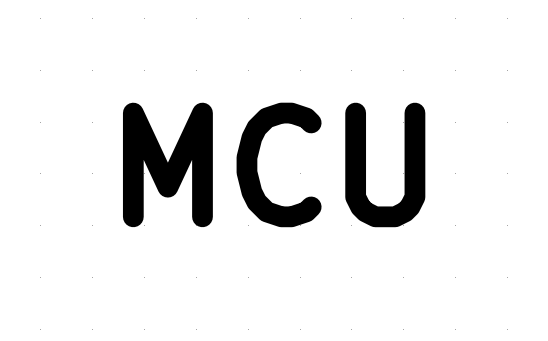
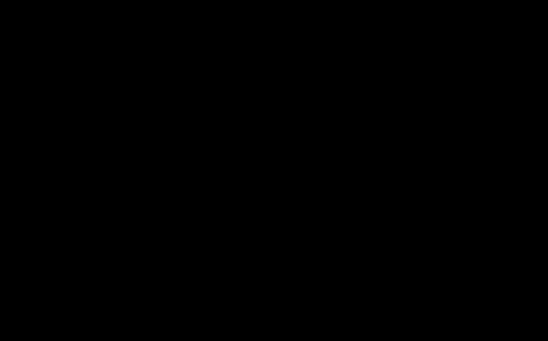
text: MCU (274, 164) -> none

